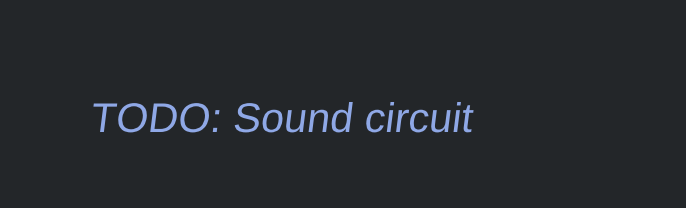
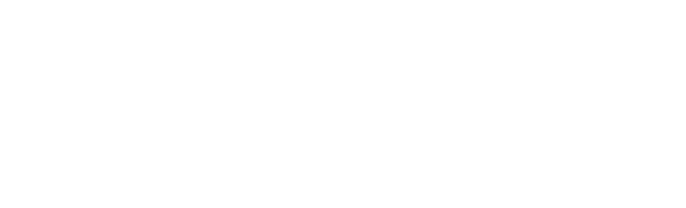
text: TODO: Sound circuit (283, 117) -> none

